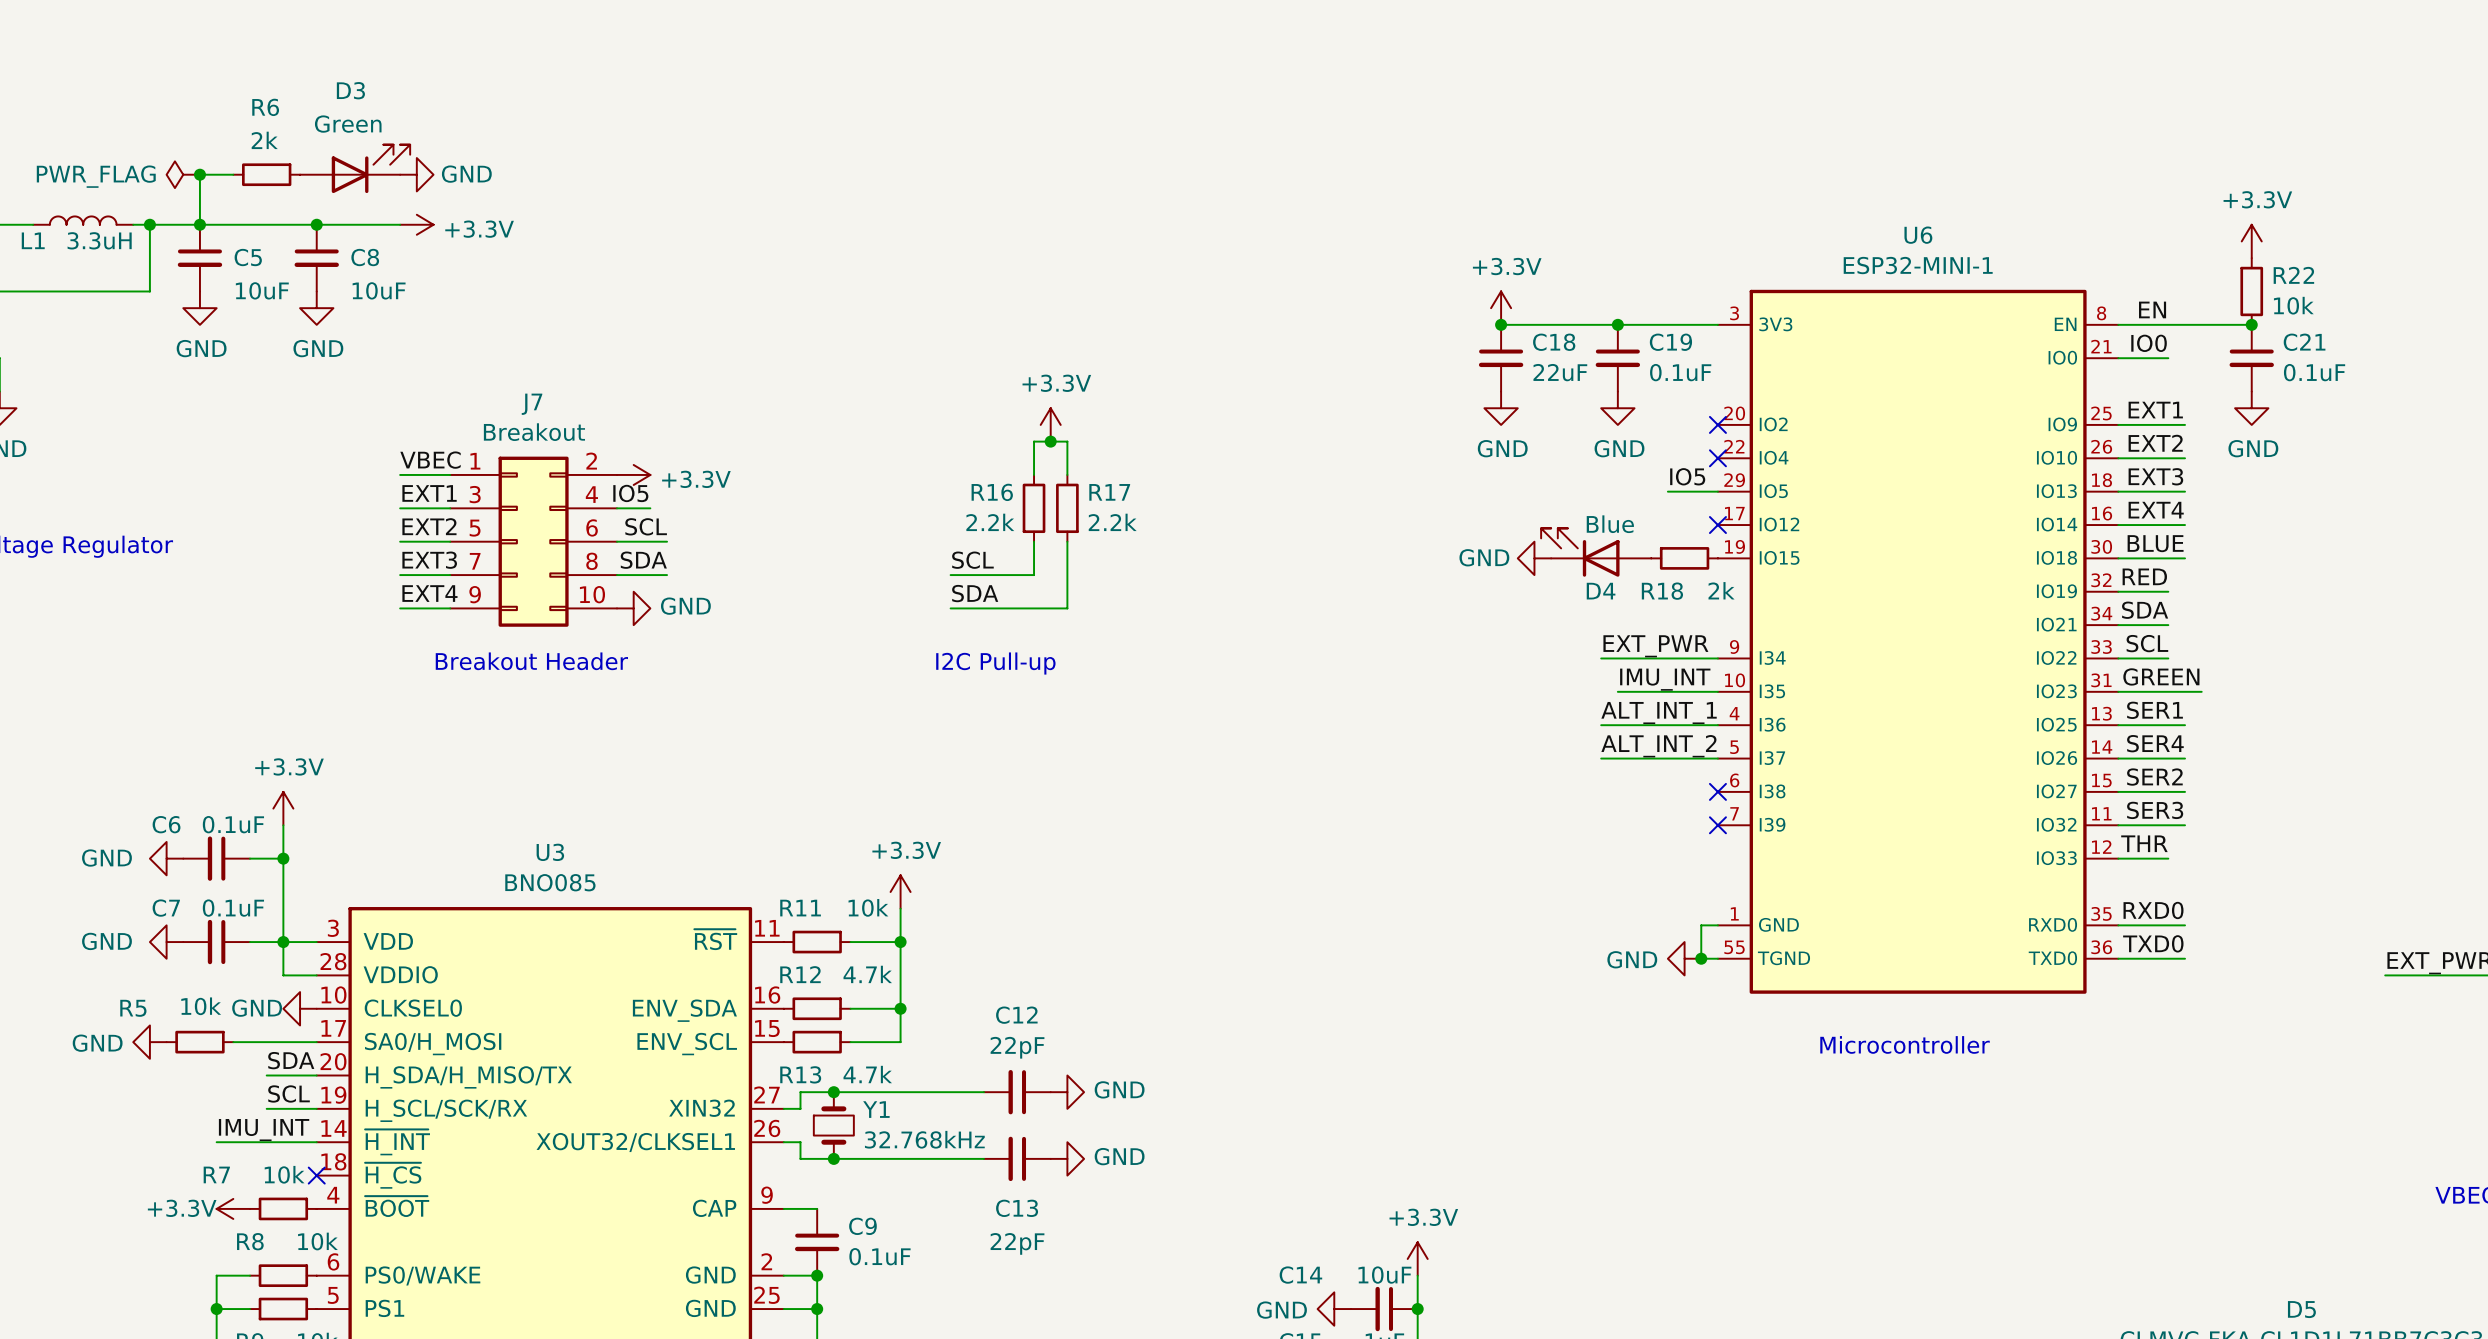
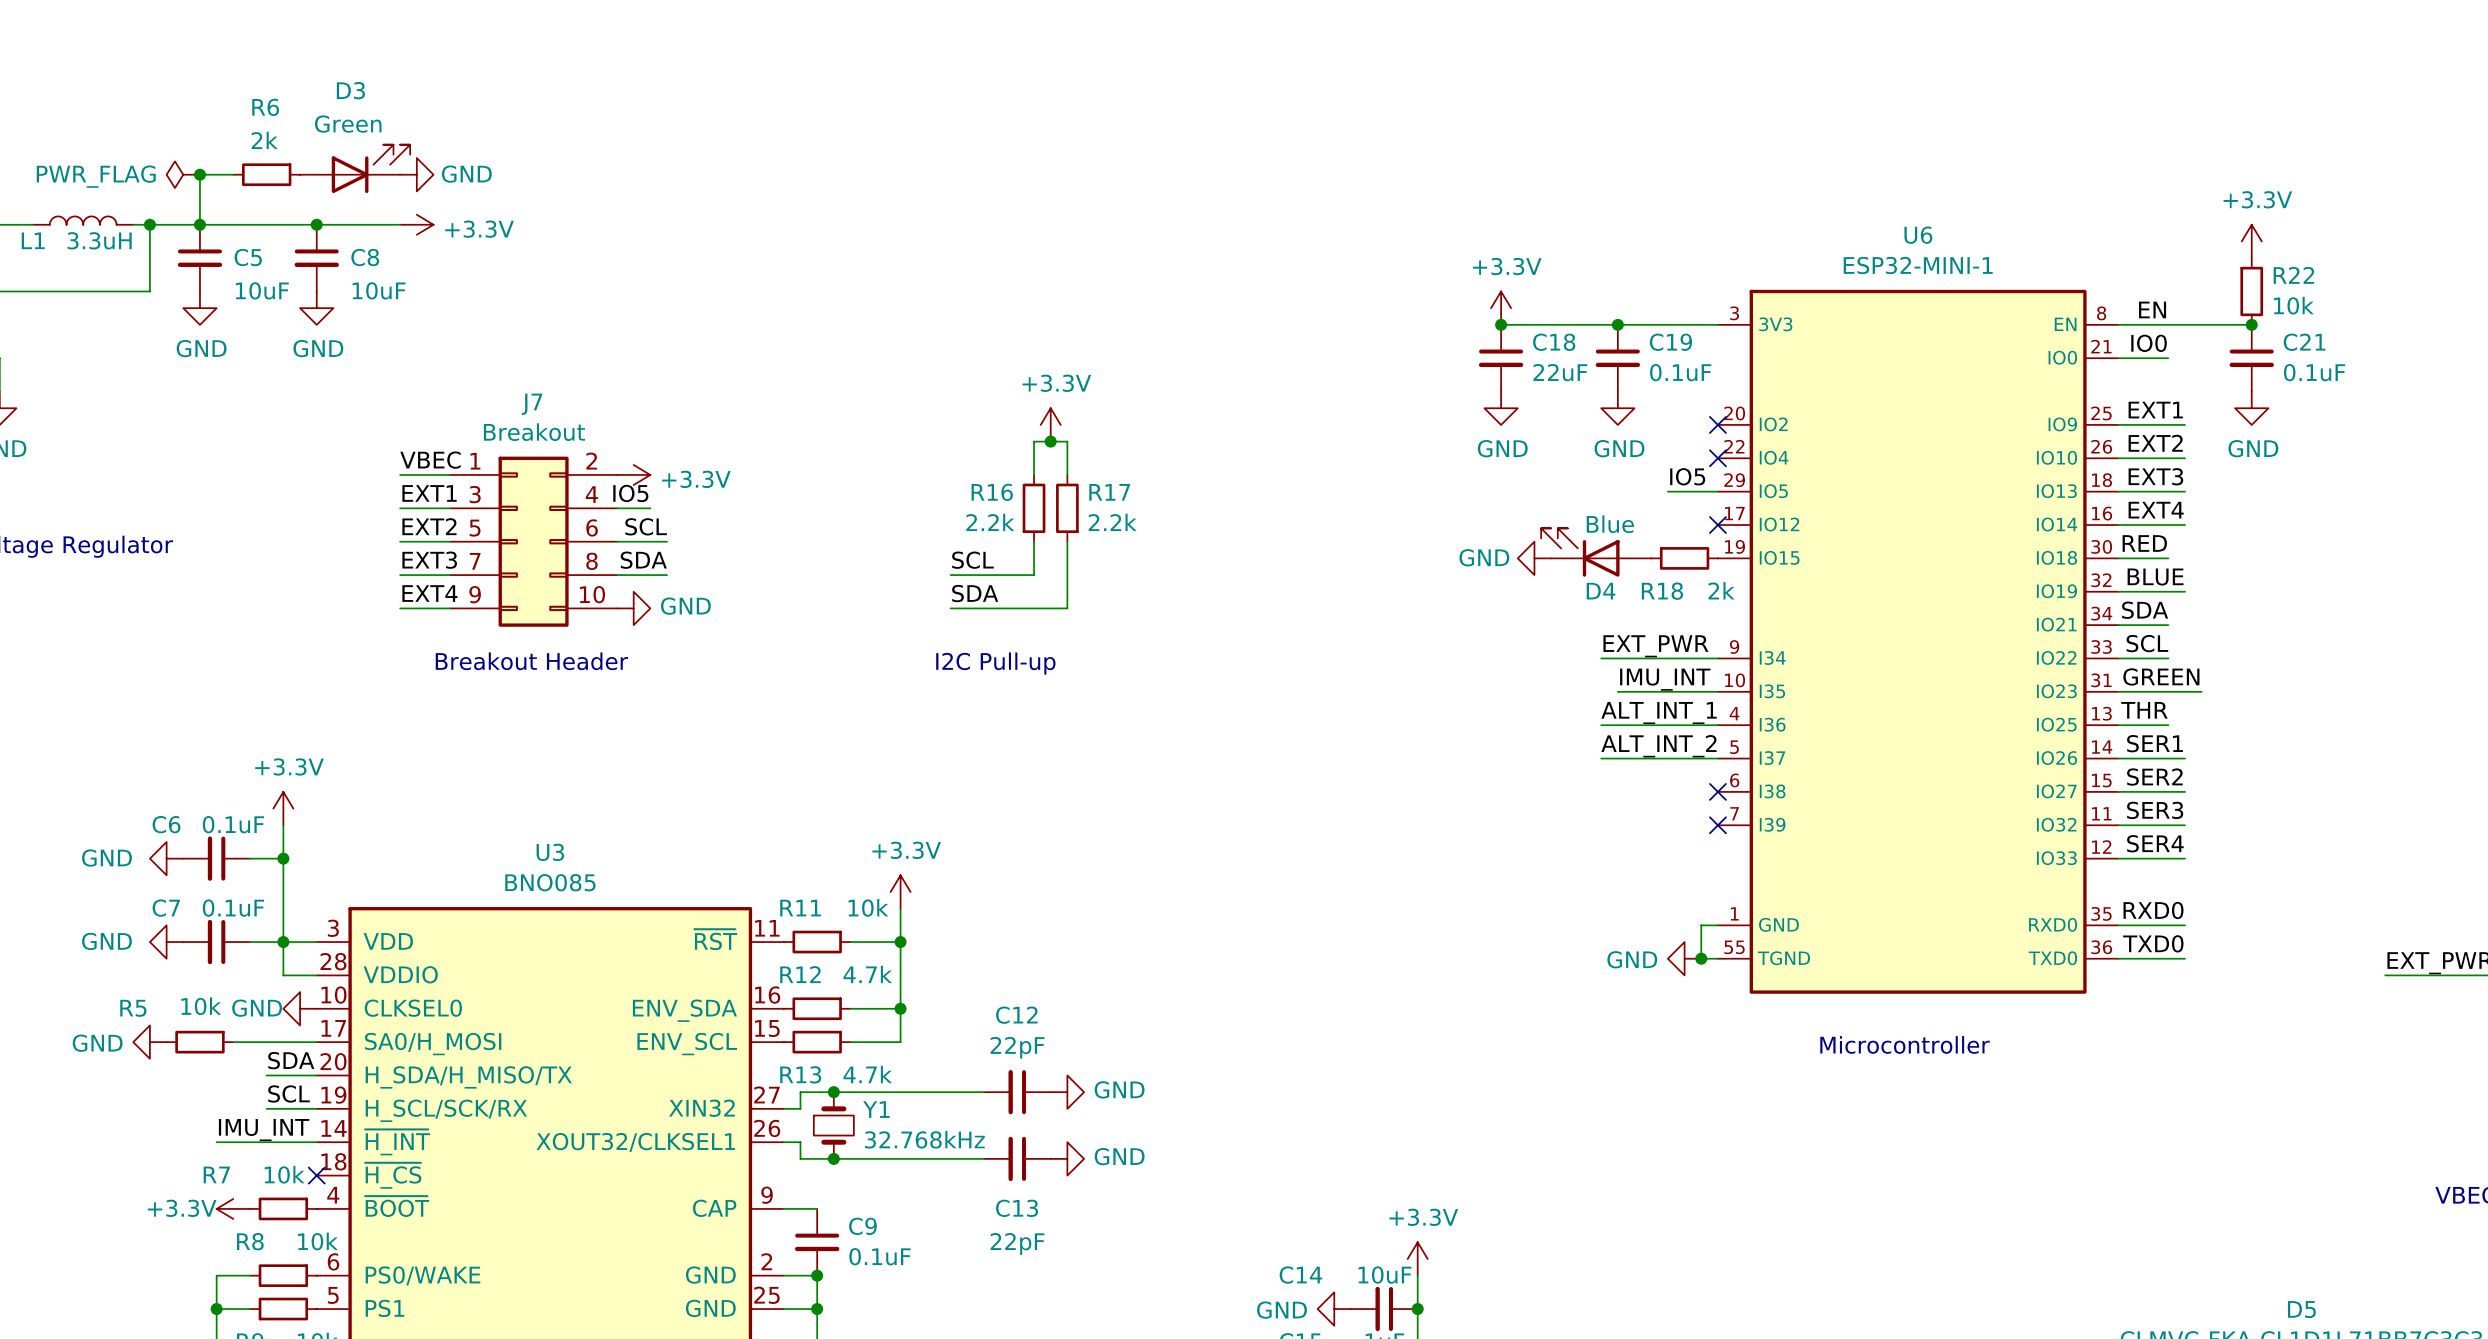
label position: BLUE (2155, 543) -> BLUE (2155, 577)
wire: (2168, 558) (2185, 558) -> (2168, 591) (2185, 591)
label position: RED (2144, 576) -> RED (2144, 543)
label: SER1 (2155, 710) -> none
wire: (2168, 725) (2185, 725) -> (2168, 858) (2185, 858)
label: SER4 (2155, 743) -> SER1 (2155, 743)
label position: THR (2144, 843) -> THR (2144, 710)
label: none -> SER4 (2155, 843)

